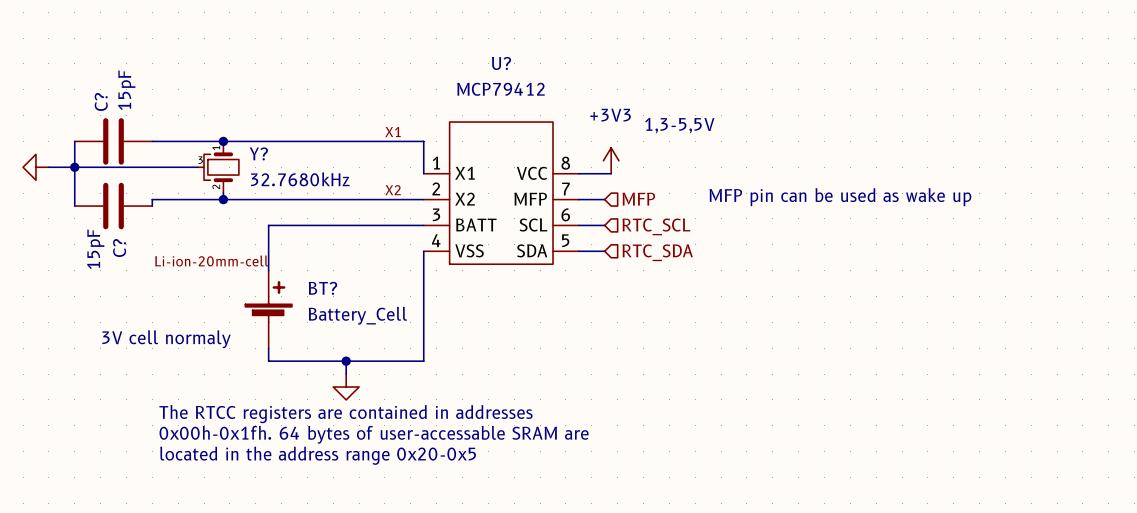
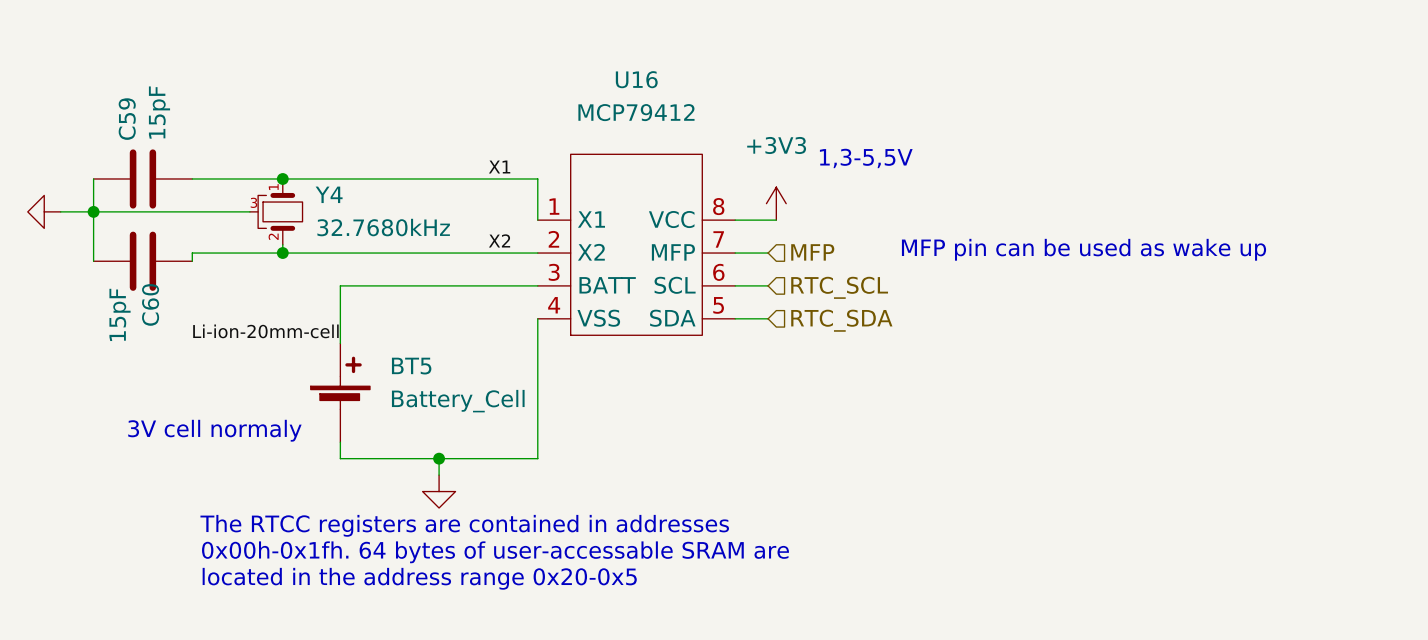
U? name: U? (501, 63) -> U16 (636, 79)
C? name: C? (101, 101) -> C59 (127, 119)
Y? name: Y? (258, 153) -> Y4 (329, 194)
C? name: C? (119, 248) -> C60 (150, 304)
BT? name: BT? (322, 288) -> BT5 (411, 366)

